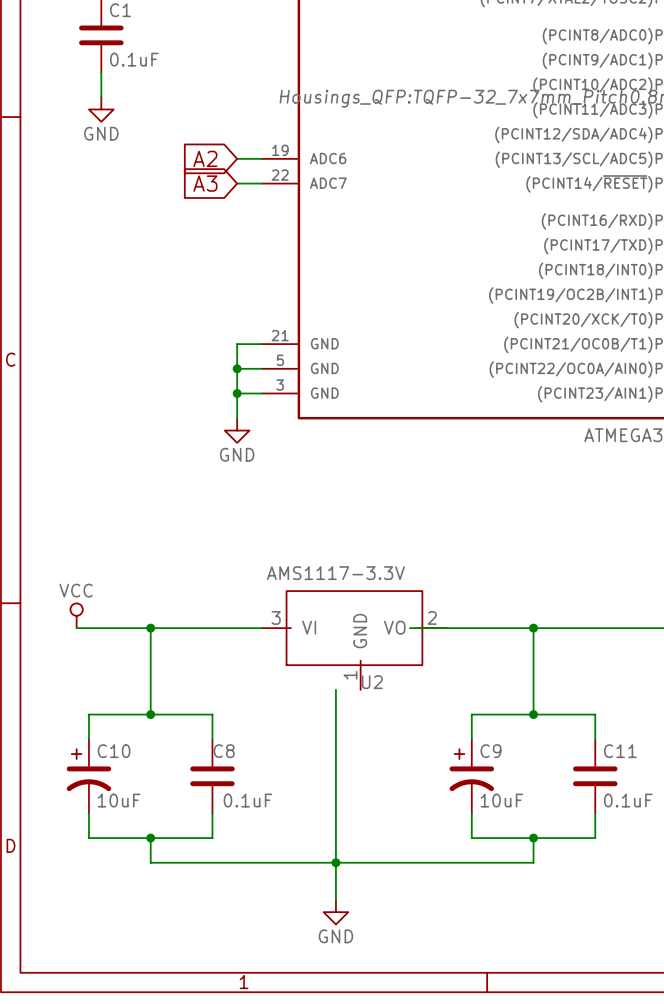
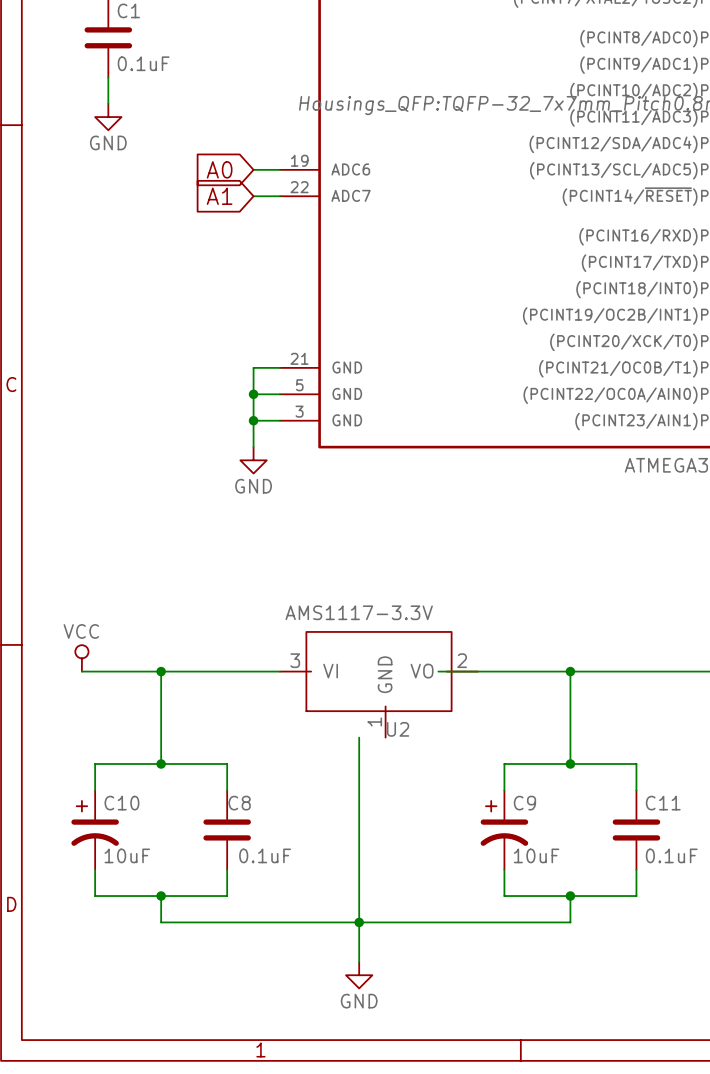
global label: A2 (205, 158) -> A0 (219, 169)
global label: A3 (205, 183) -> A1 (219, 196)

